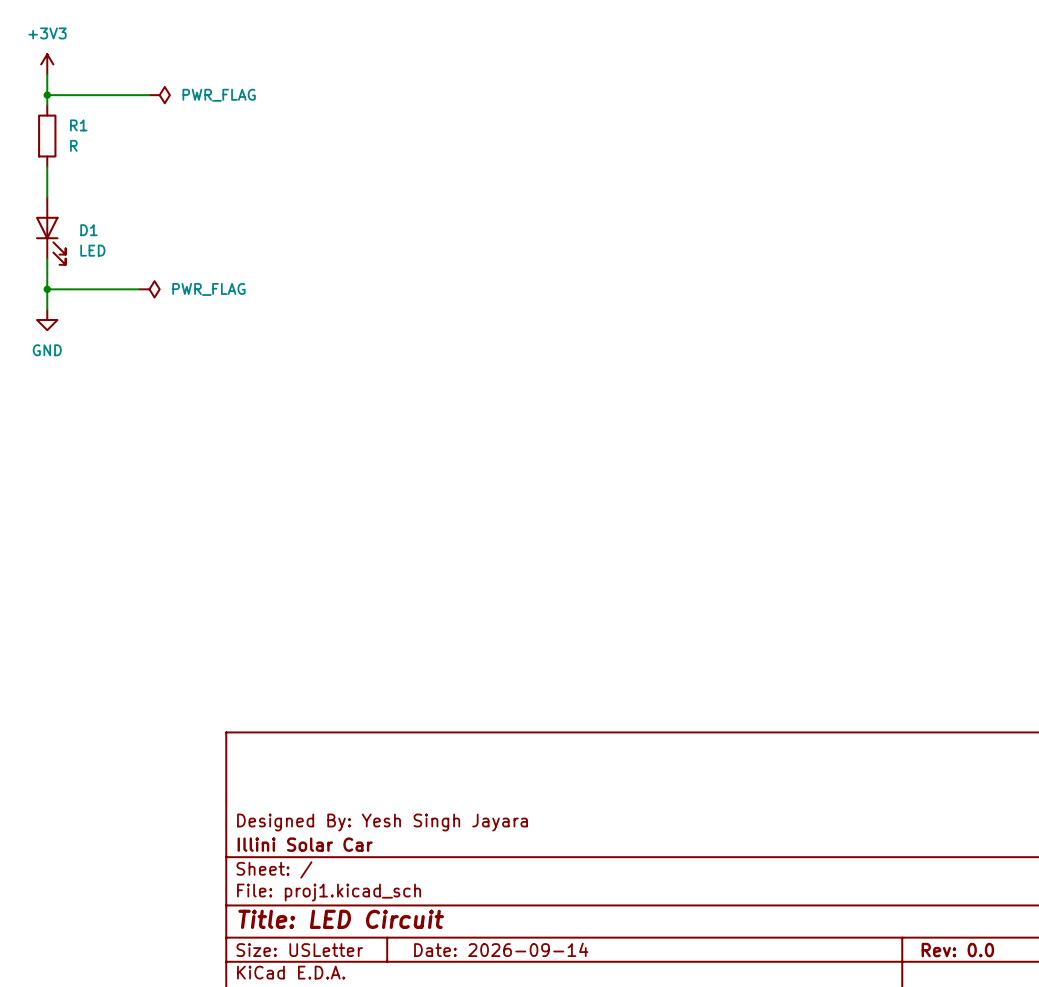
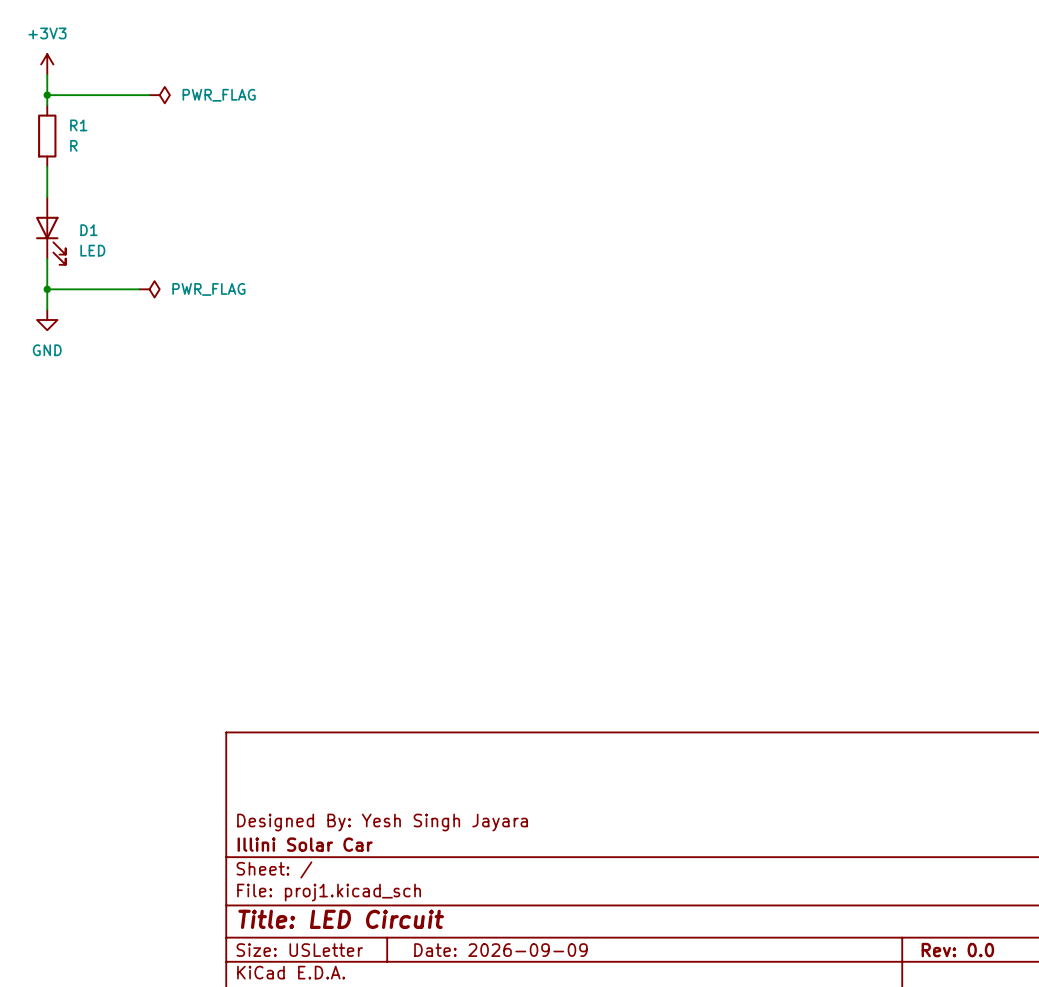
title block: Date: 2026-09-14 (501, 949) -> Date: 2026-09-09 (500, 950)

